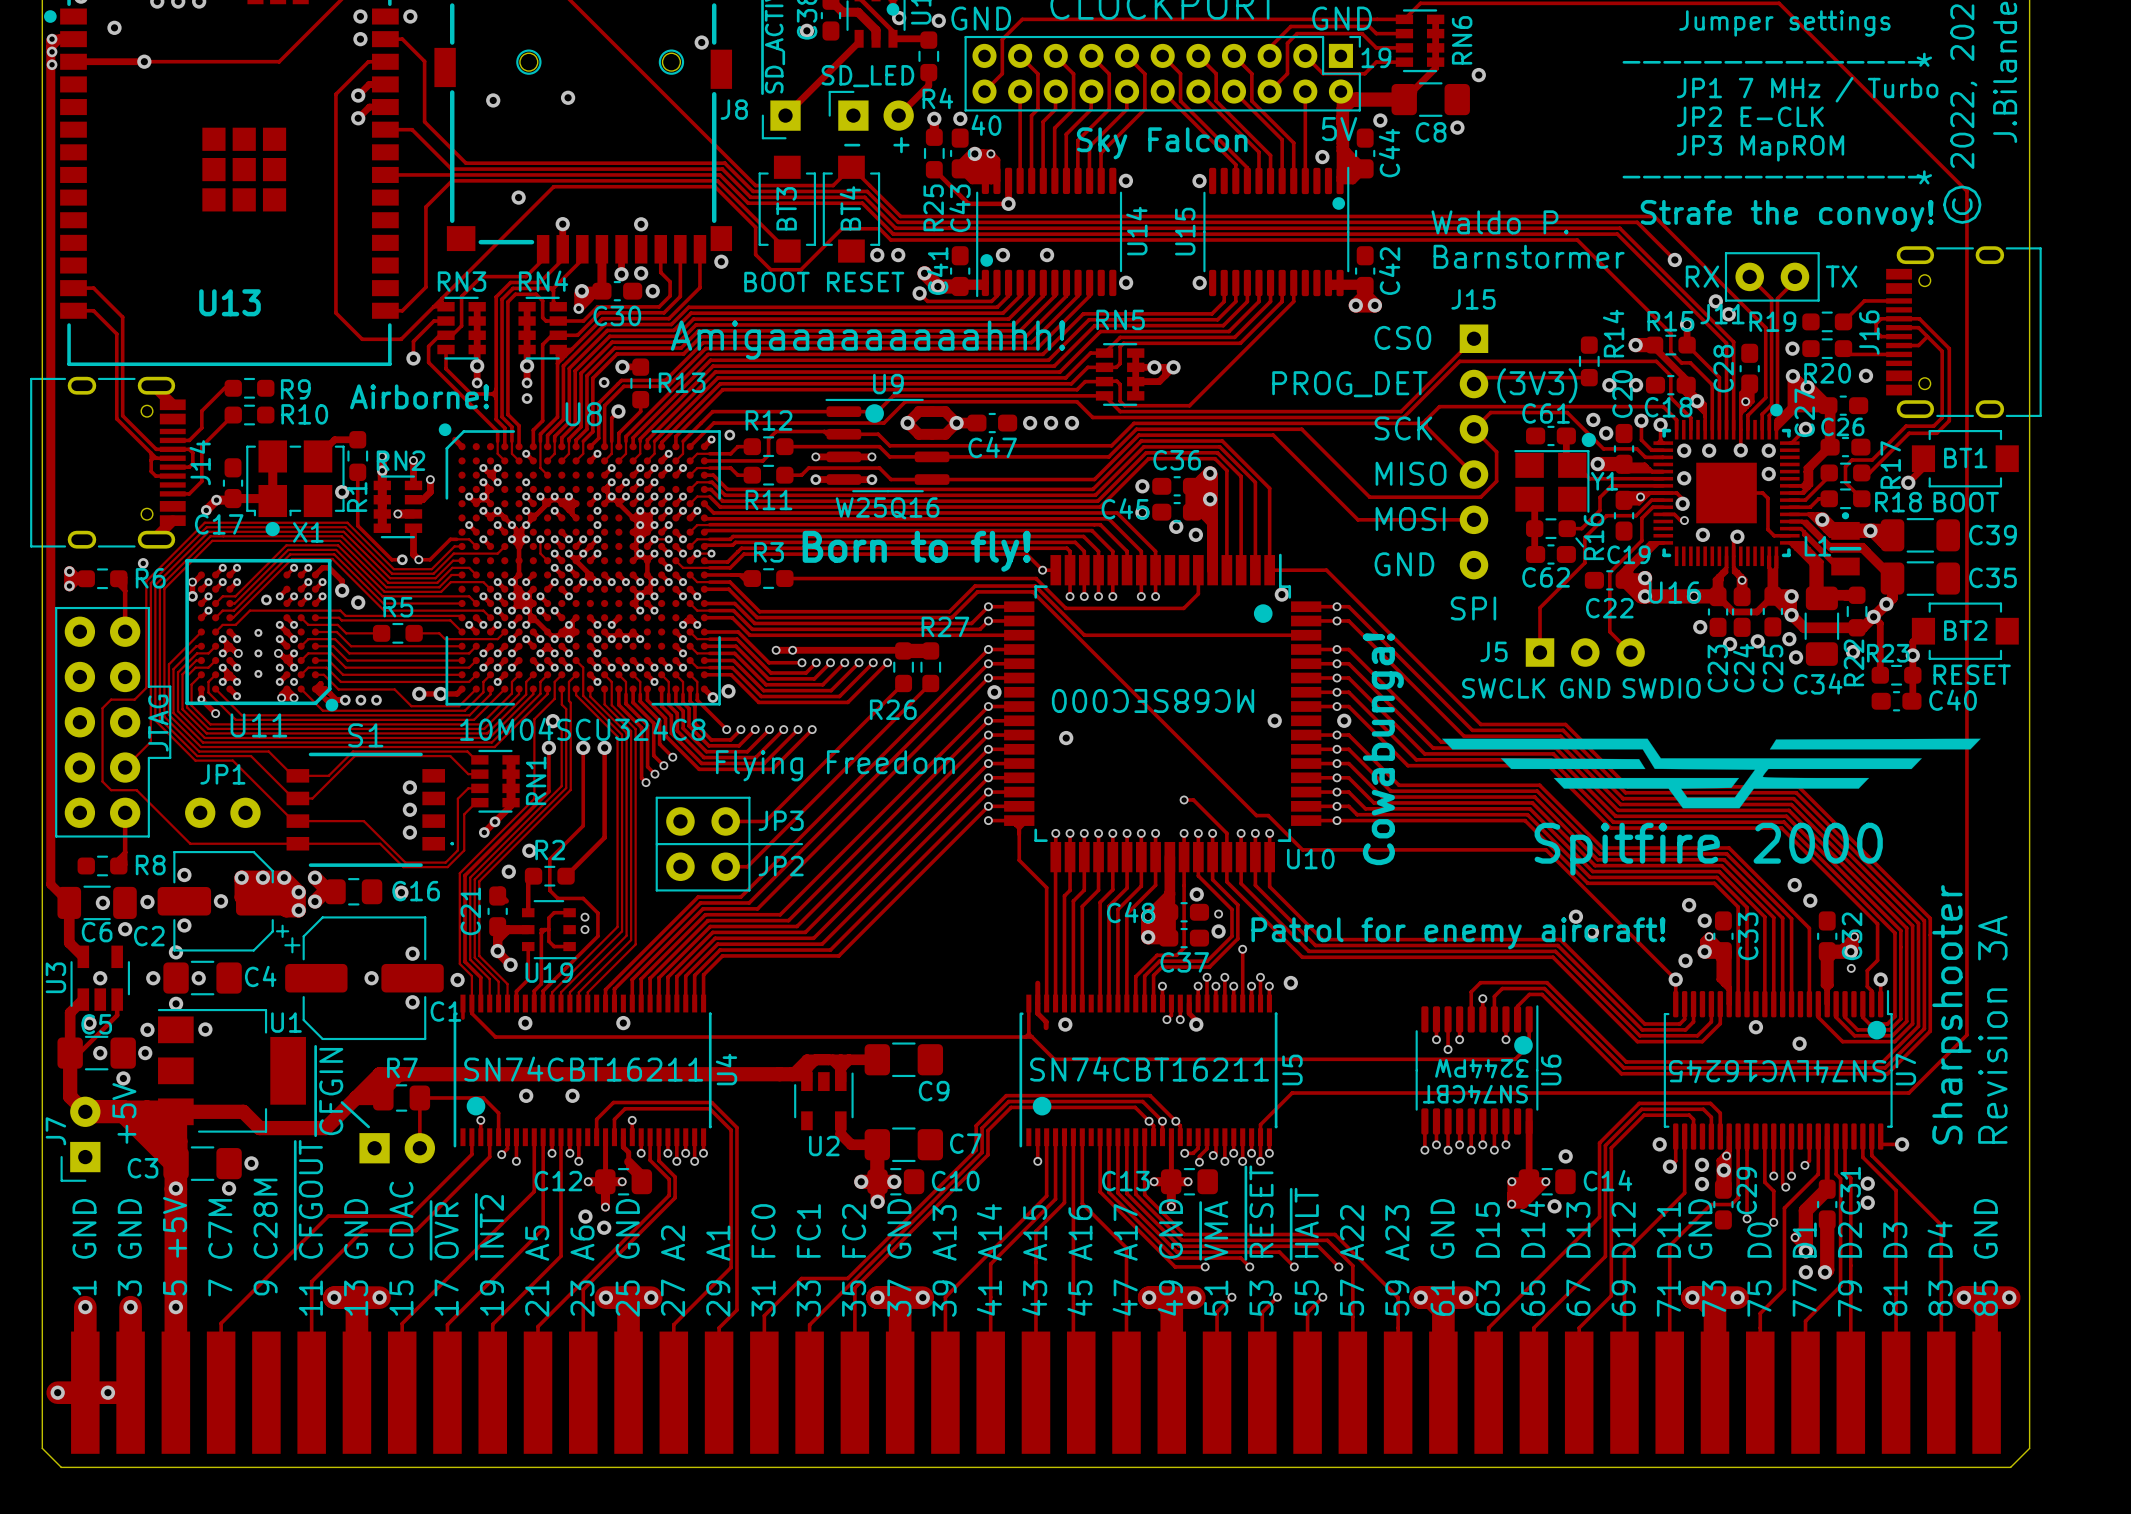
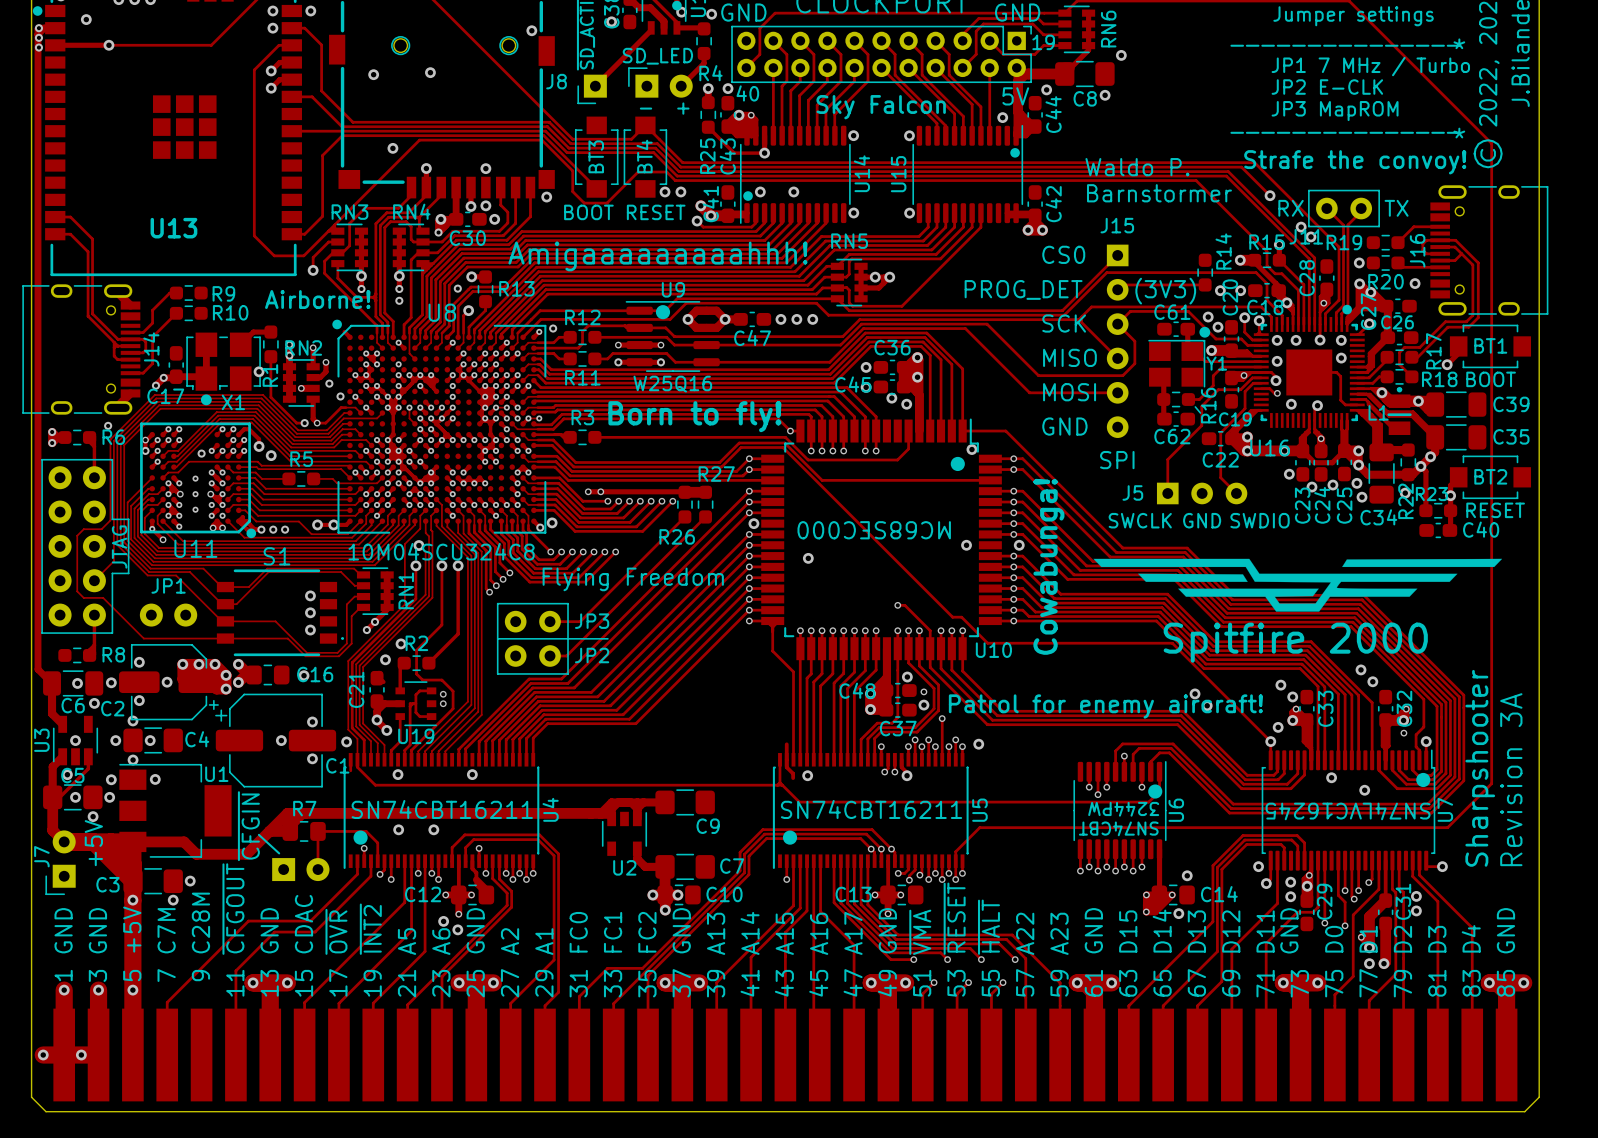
via: none -> (329, 383)
via: none -> (340, 396)

